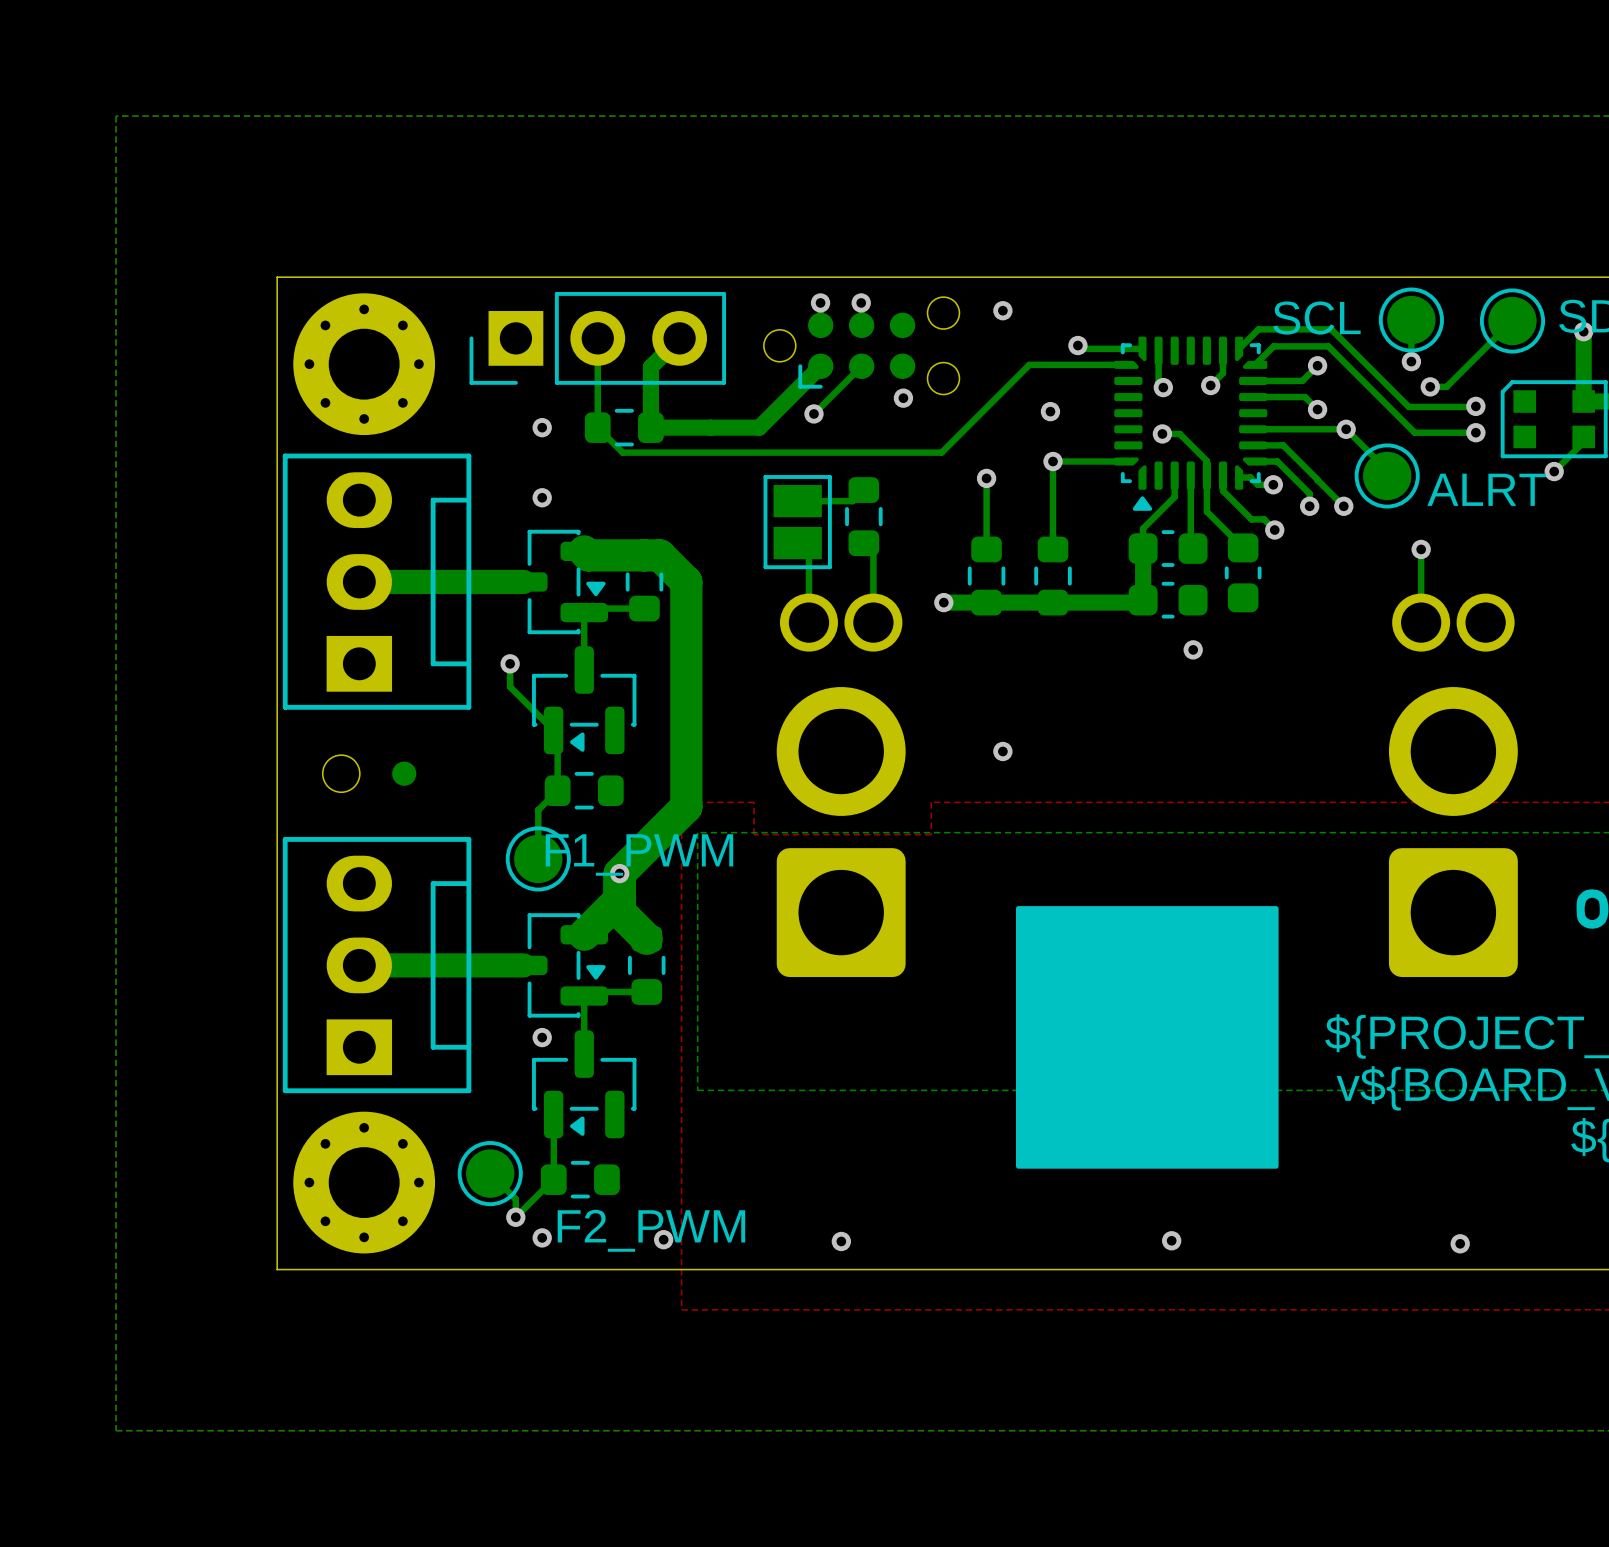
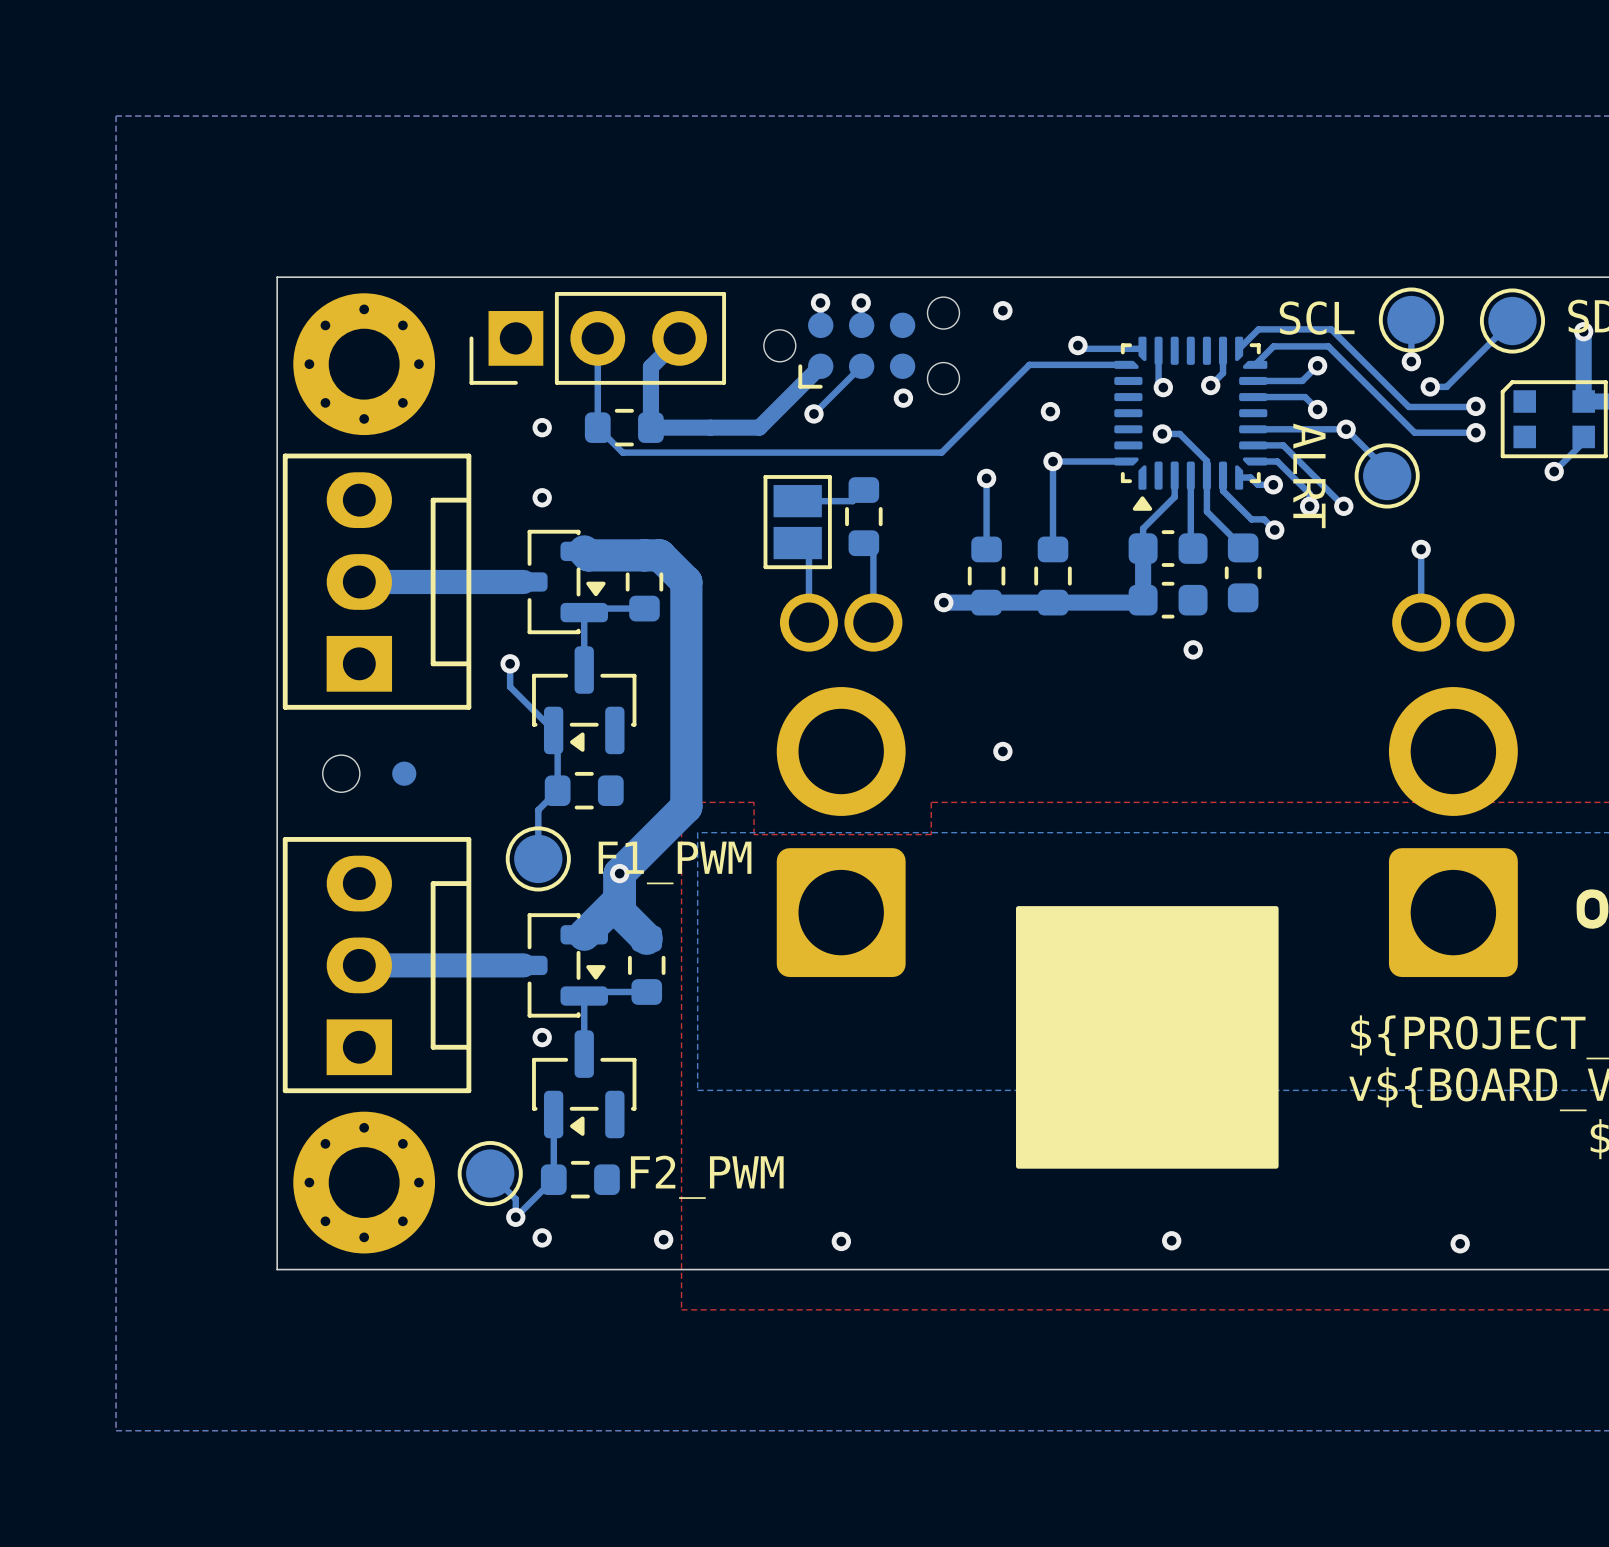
text rotation: 0° (1486, 489) -> 90° clockwise (1309, 475)
text position: ALRT (1486, 489) -> ALRT (1309, 475)
text position: F1_PWM (639, 854) -> F1_PWM (675, 862)
text position: F2_PWM (651, 1230) -> F2_PWM (707, 1177)

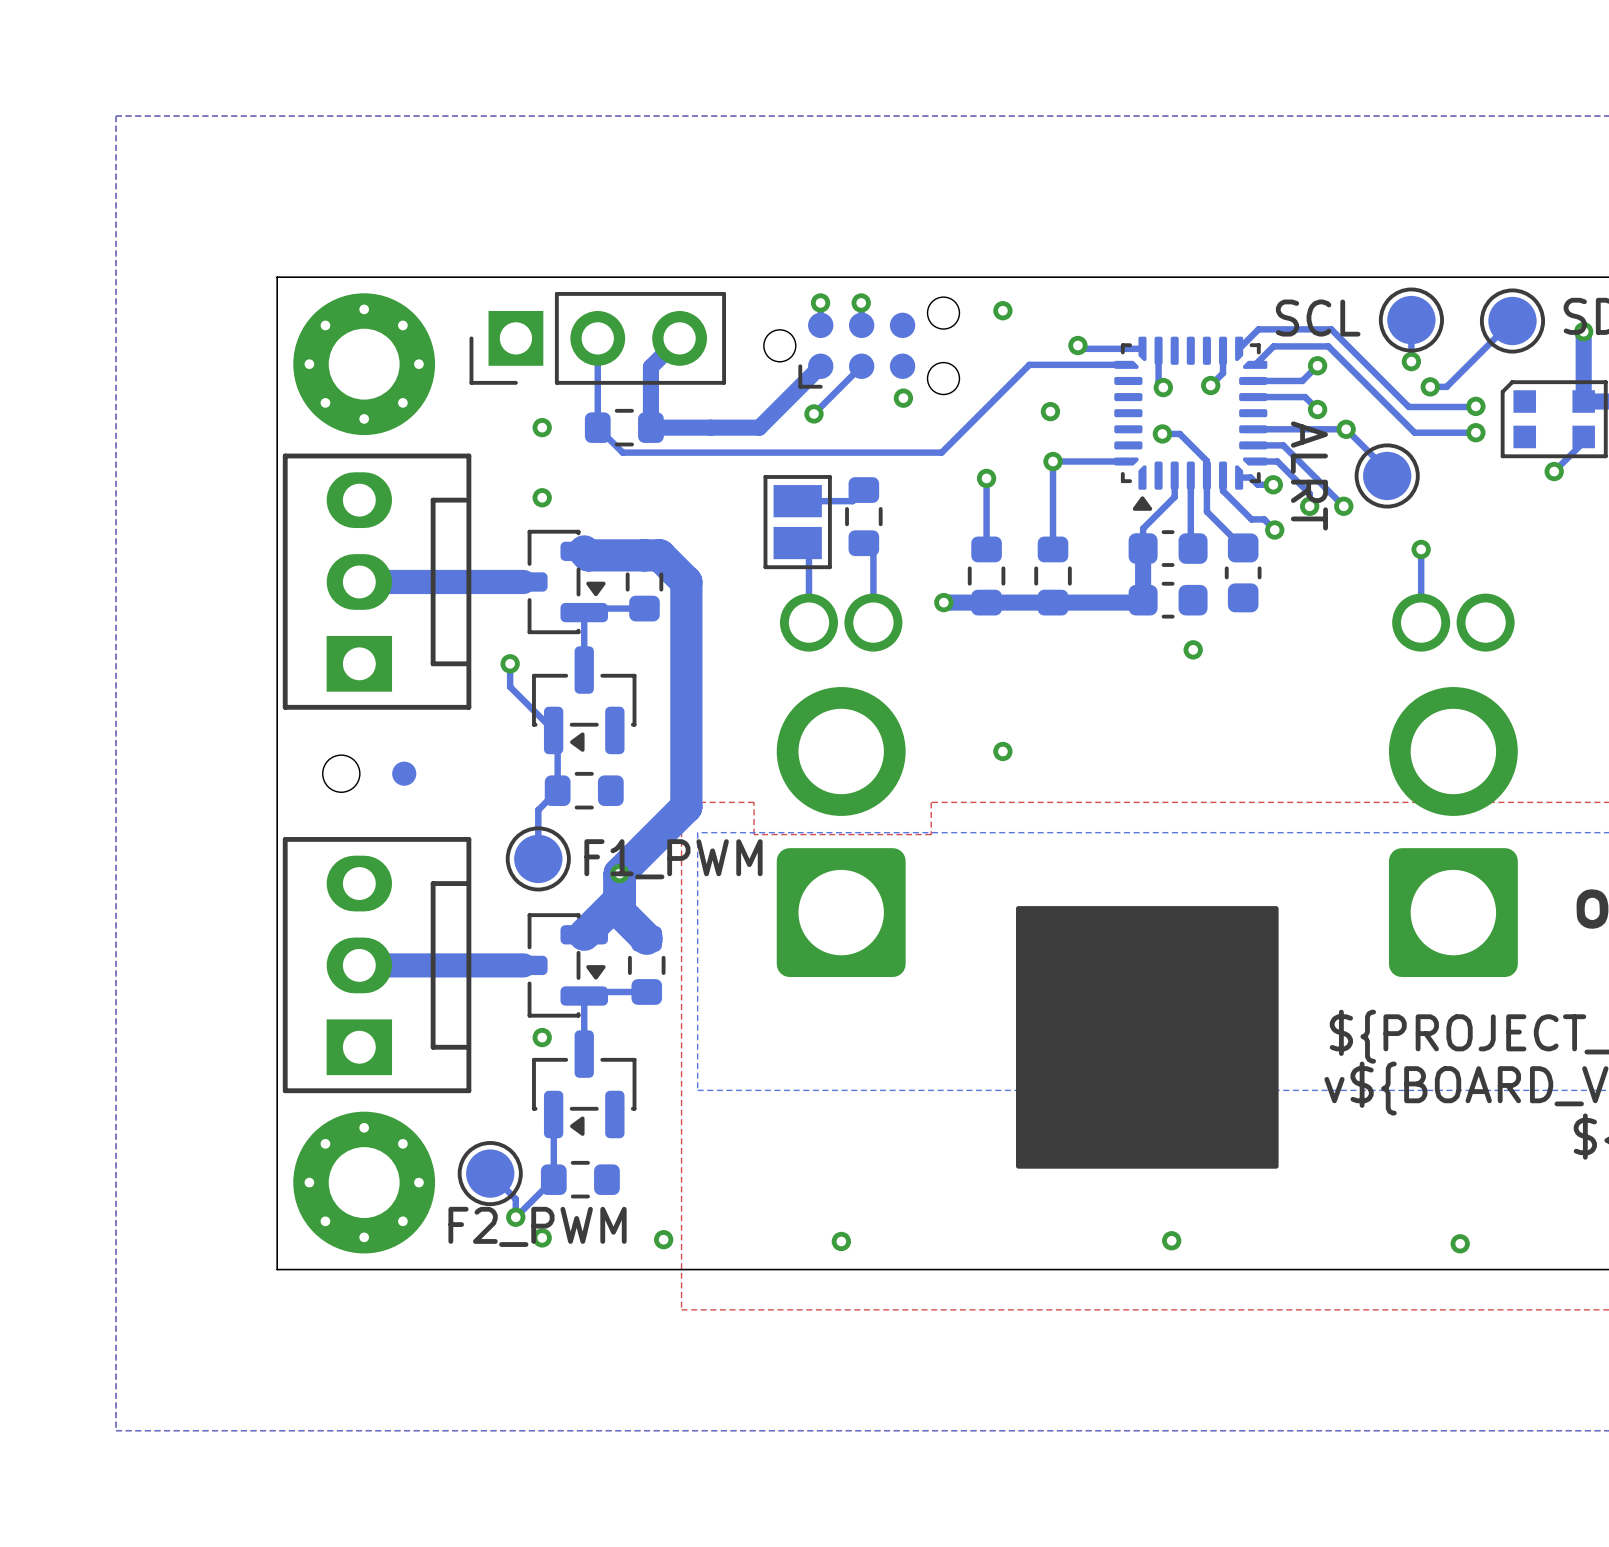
text position: F2_PWM (707, 1177) -> F2_PWM (537, 1226)

